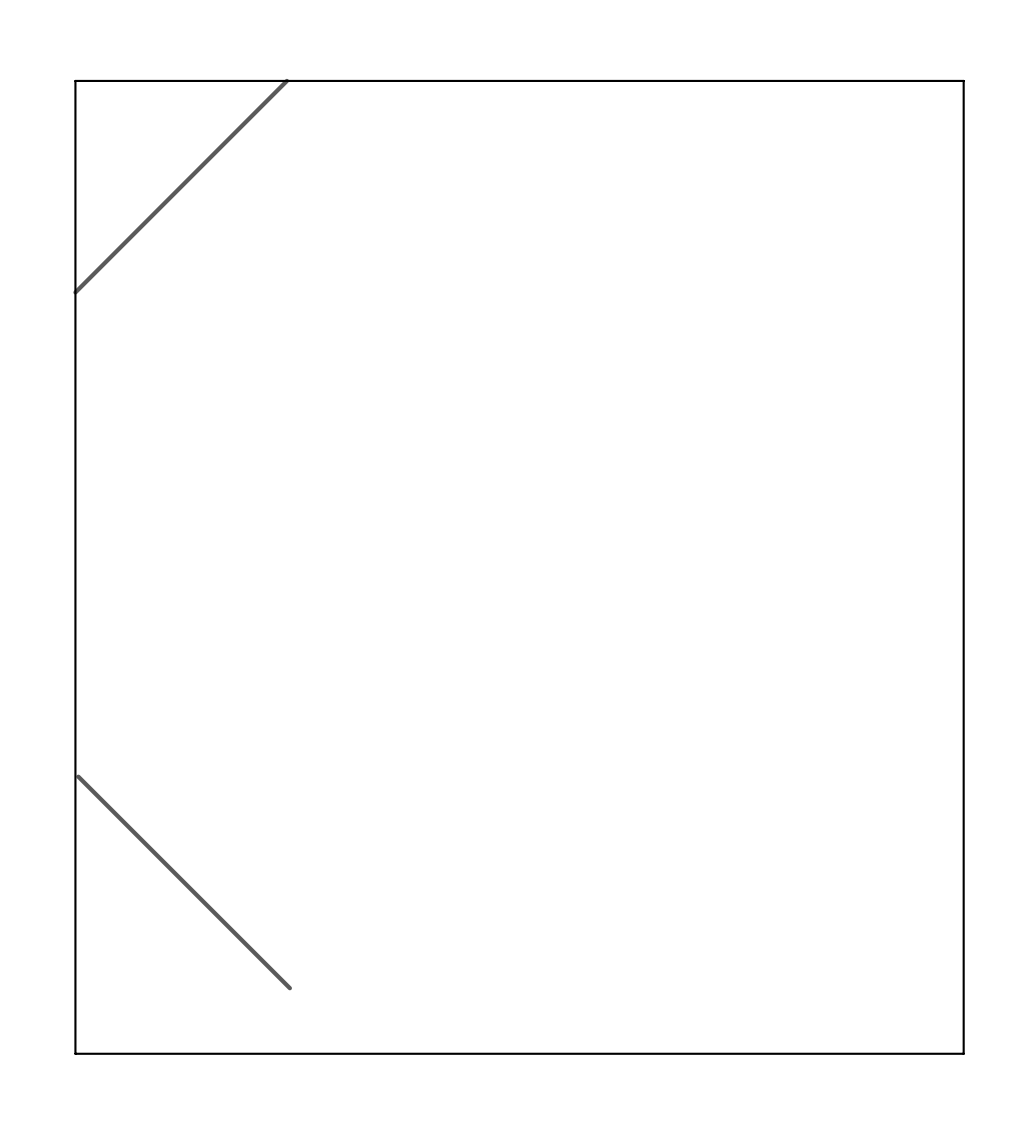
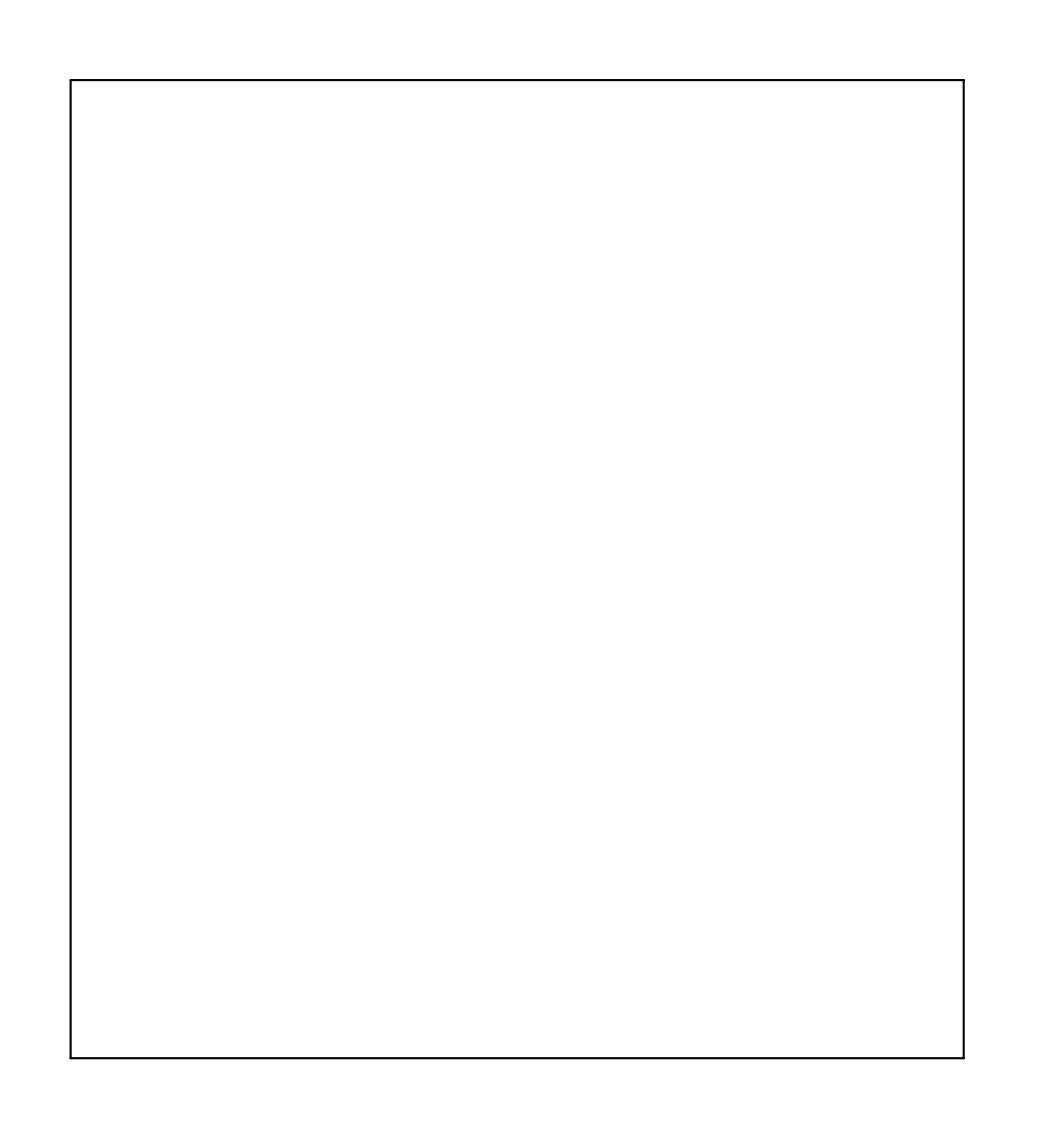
line: (286, 80) (75, 292) -> none
line: (78, 776) (289, 988) -> none

